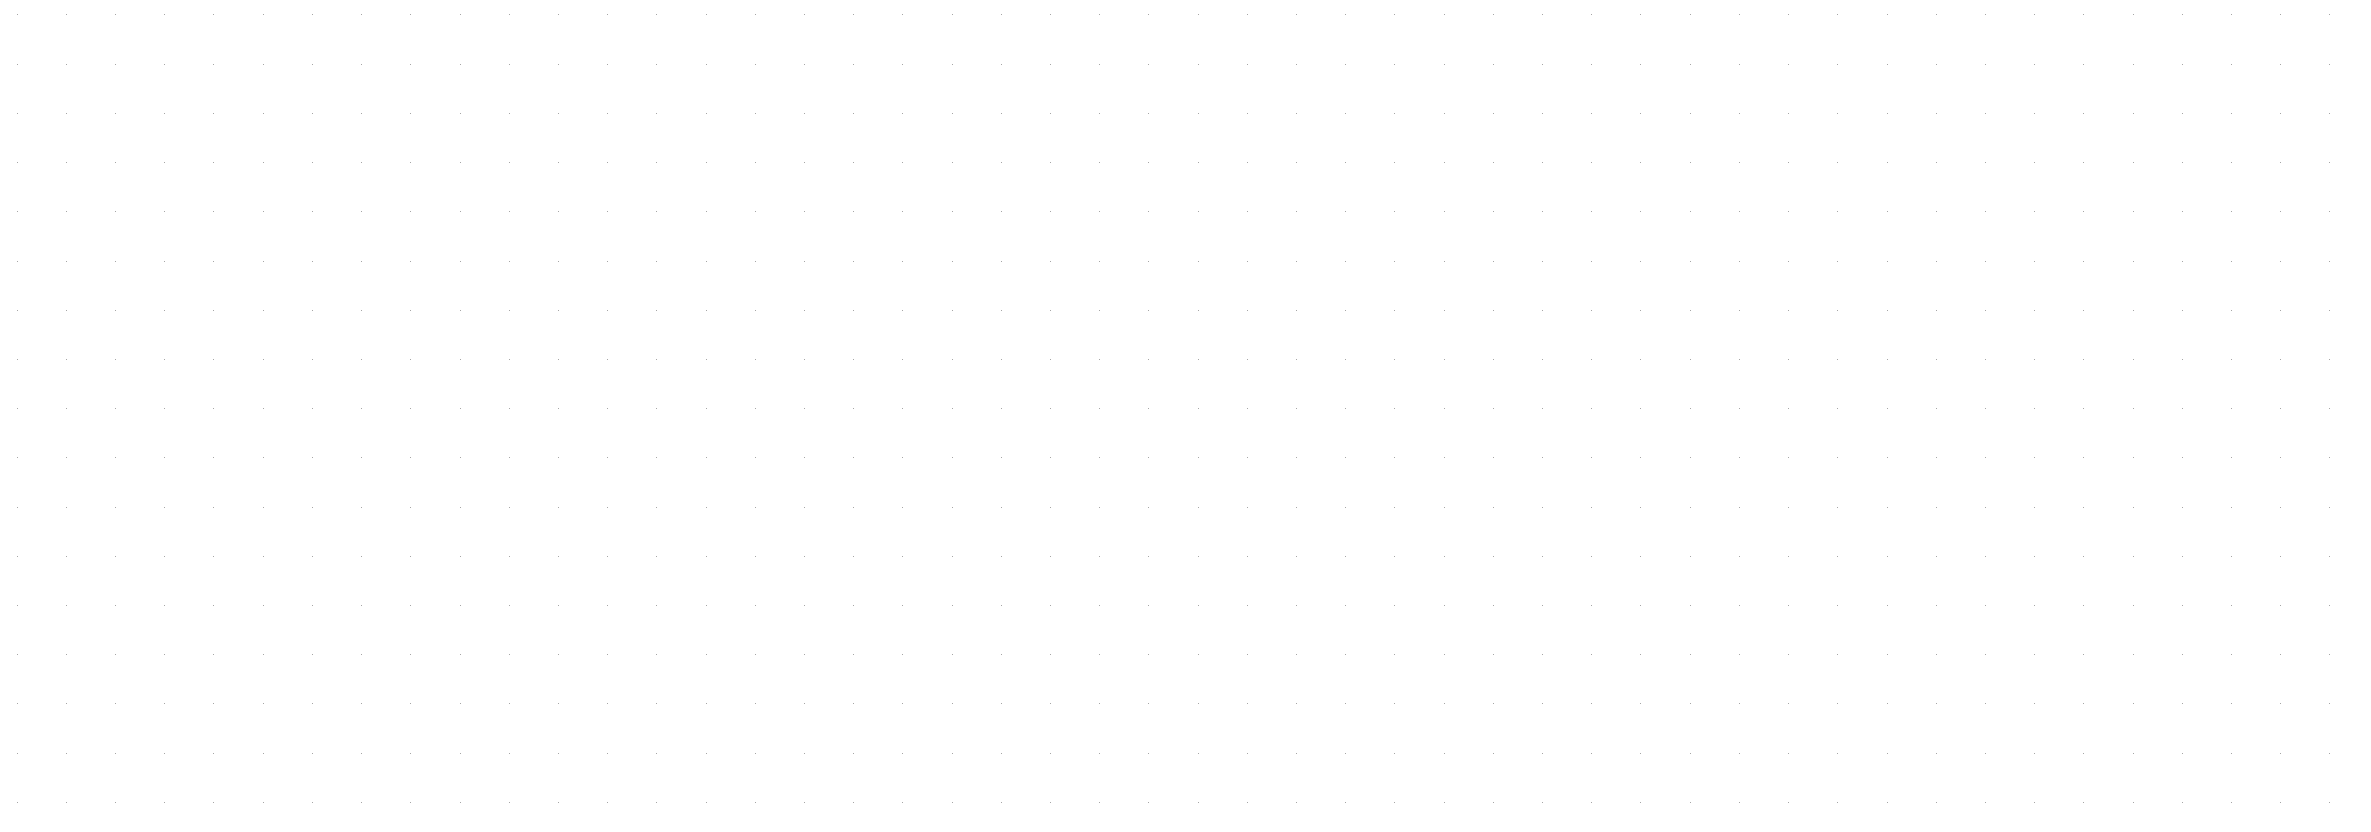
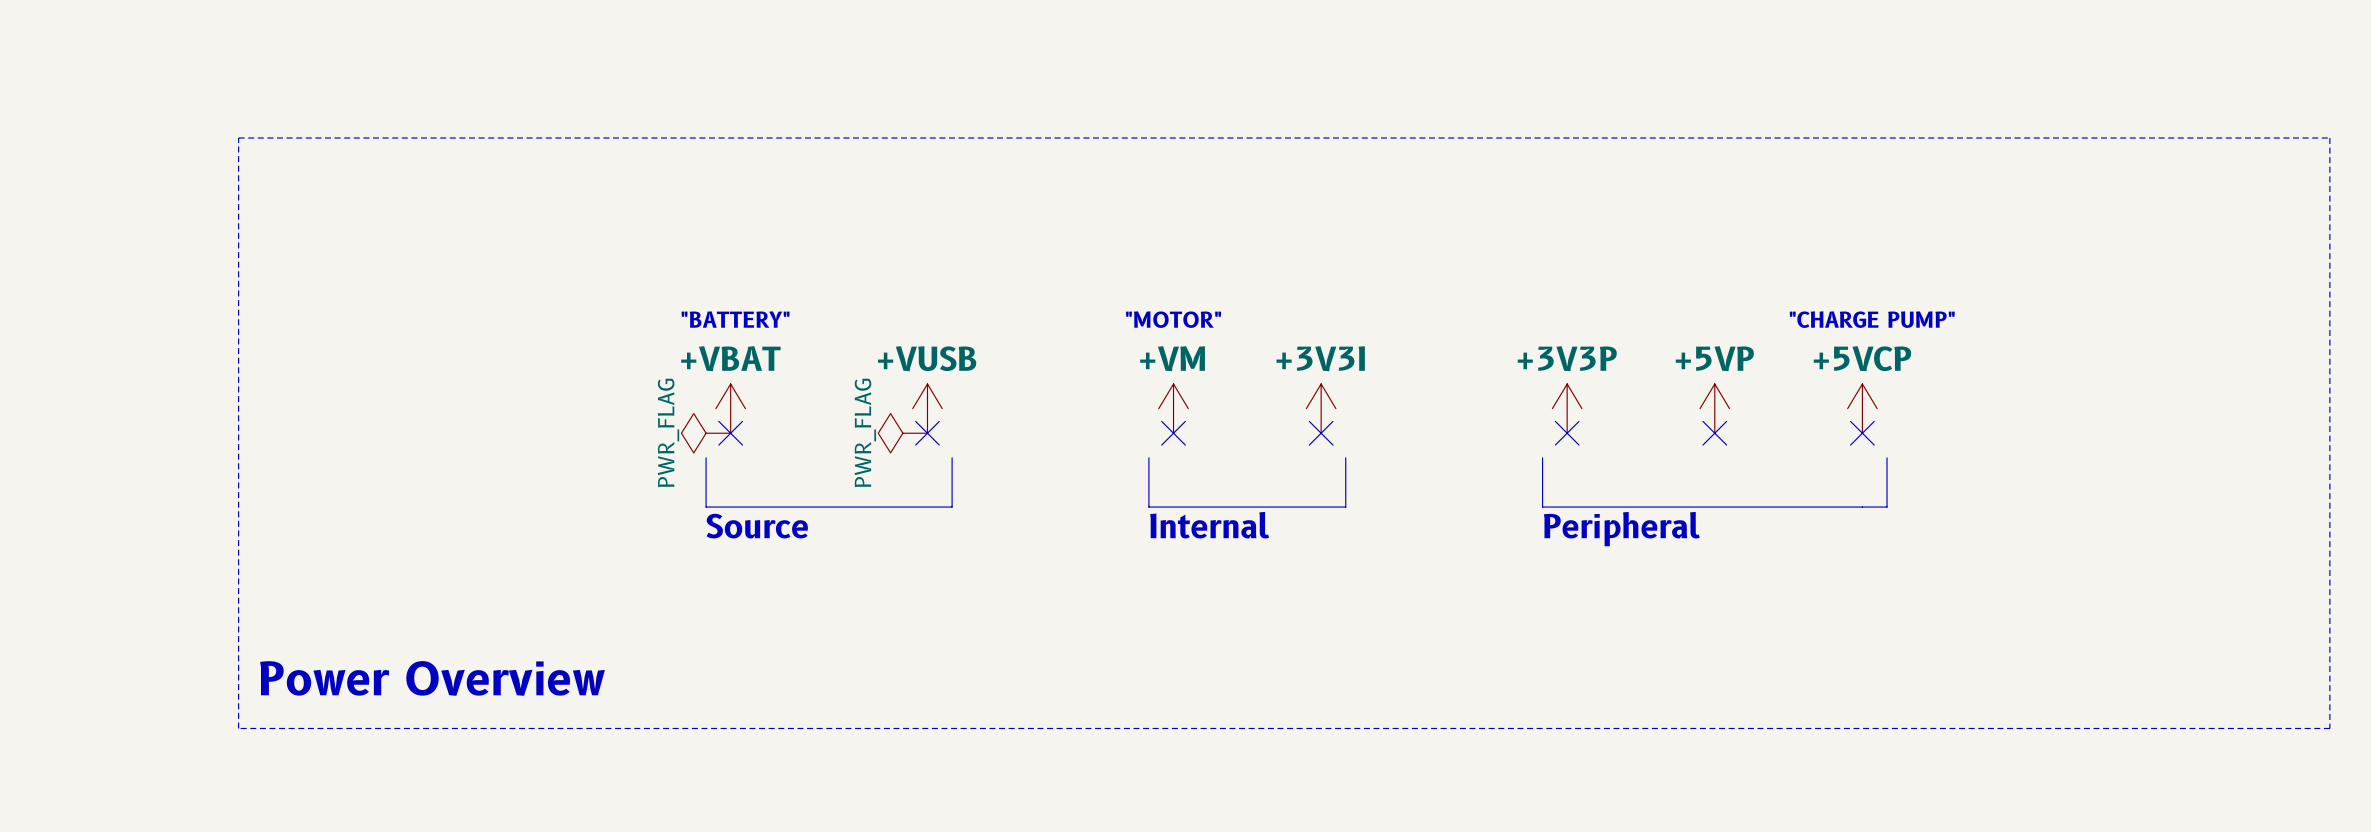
line: none -> (238, 137) (2329, 137) (2329, 728) (238, 728) (238, 137)
text: none -> "BATTERY" (735, 319)
text: none -> "MOTOR" (1173, 319)
text: none -> "CHARGE PUMP" (1872, 319)
power symbol: none -> +VBAT (730, 408)
power symbol: none -> +VUSB (927, 408)
power symbol: none -> +VM (1173, 408)
power symbol: none -> +3V3I (1321, 408)
power symbol: none -> +3V3P (1567, 408)
power symbol: none -> +5VP (1714, 408)
power symbol: none -> +5VCP (1862, 408)
power symbol: none -> PWR_FLAG (706, 433)
no-connect mark: none -> (730, 433)
power symbol: none -> PWR_FLAG (902, 433)
no-connect mark: none -> (927, 433)
no-connect mark: none -> (1173, 433)
no-connect mark: none -> (1321, 433)
no-connect mark: none -> (1567, 433)
no-connect mark: none -> (1714, 433)
no-connect mark: none -> (1862, 433)
line: none -> (706, 457) (706, 507) (952, 507) (952, 457)
line: none -> (1148, 457) (1148, 507) (1345, 507) (1345, 457)
line: none -> (1542, 457) (1542, 507) (1887, 507) (1887, 457)
text: none -> Source (757, 526)
text: none -> Internal (1209, 525)
text: none -> Peripheral (1621, 529)
text: none -> Power Overview (432, 678)

